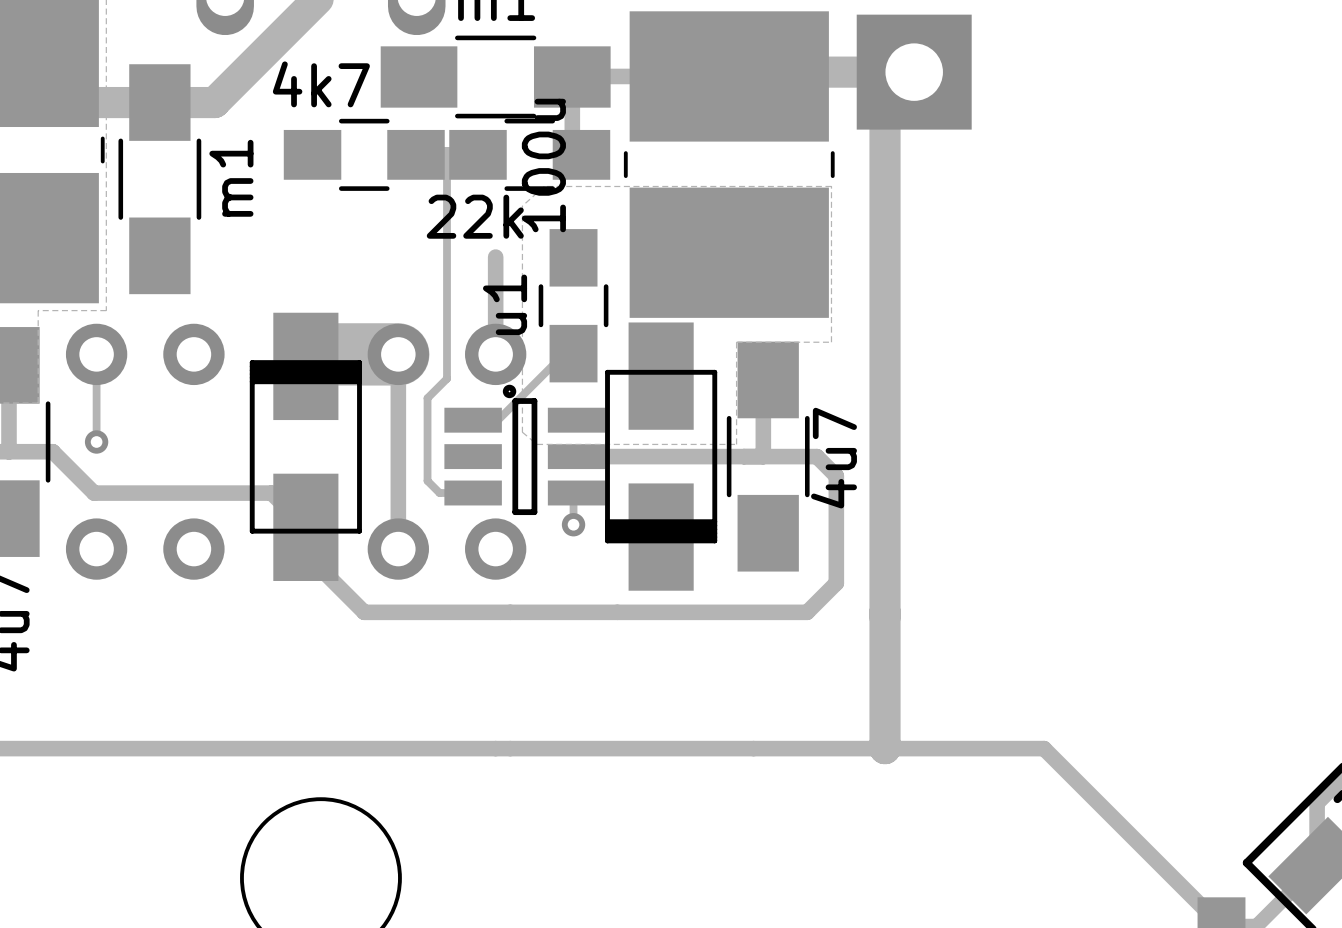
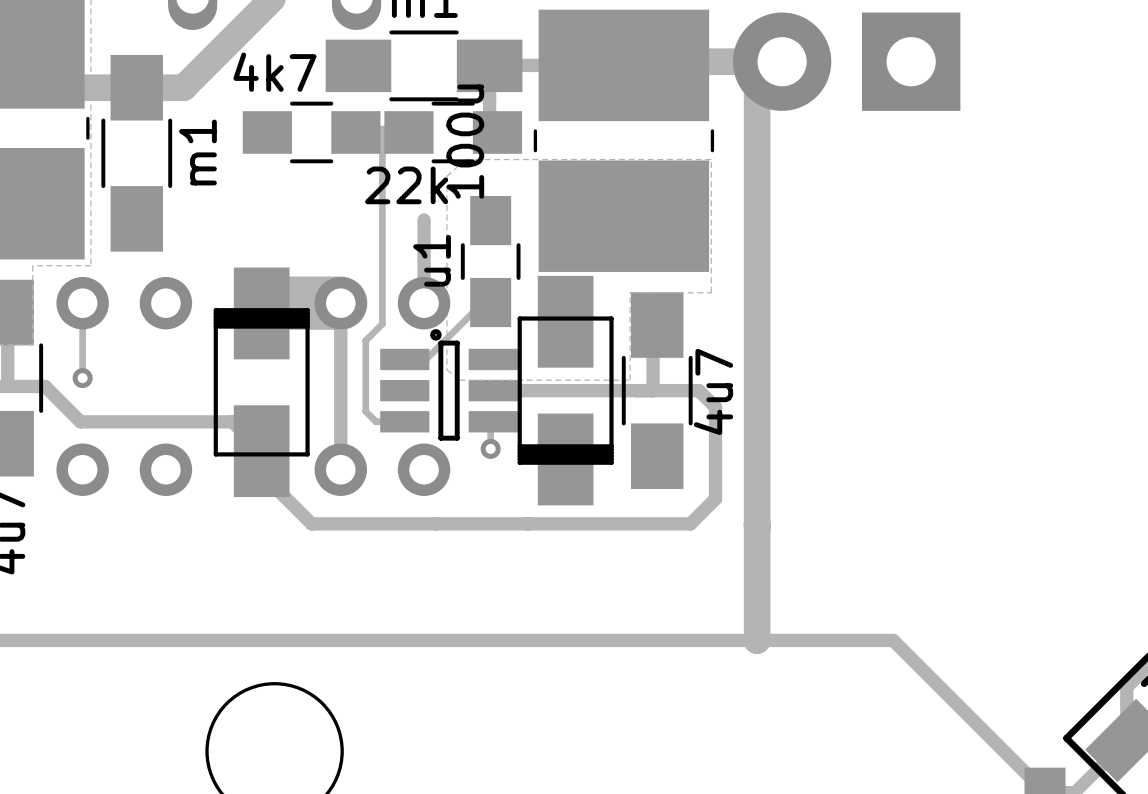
part footprint: [856, 14, 972, 130] -> [732, 12, 832, 111]
part: none -> (911, 61)

